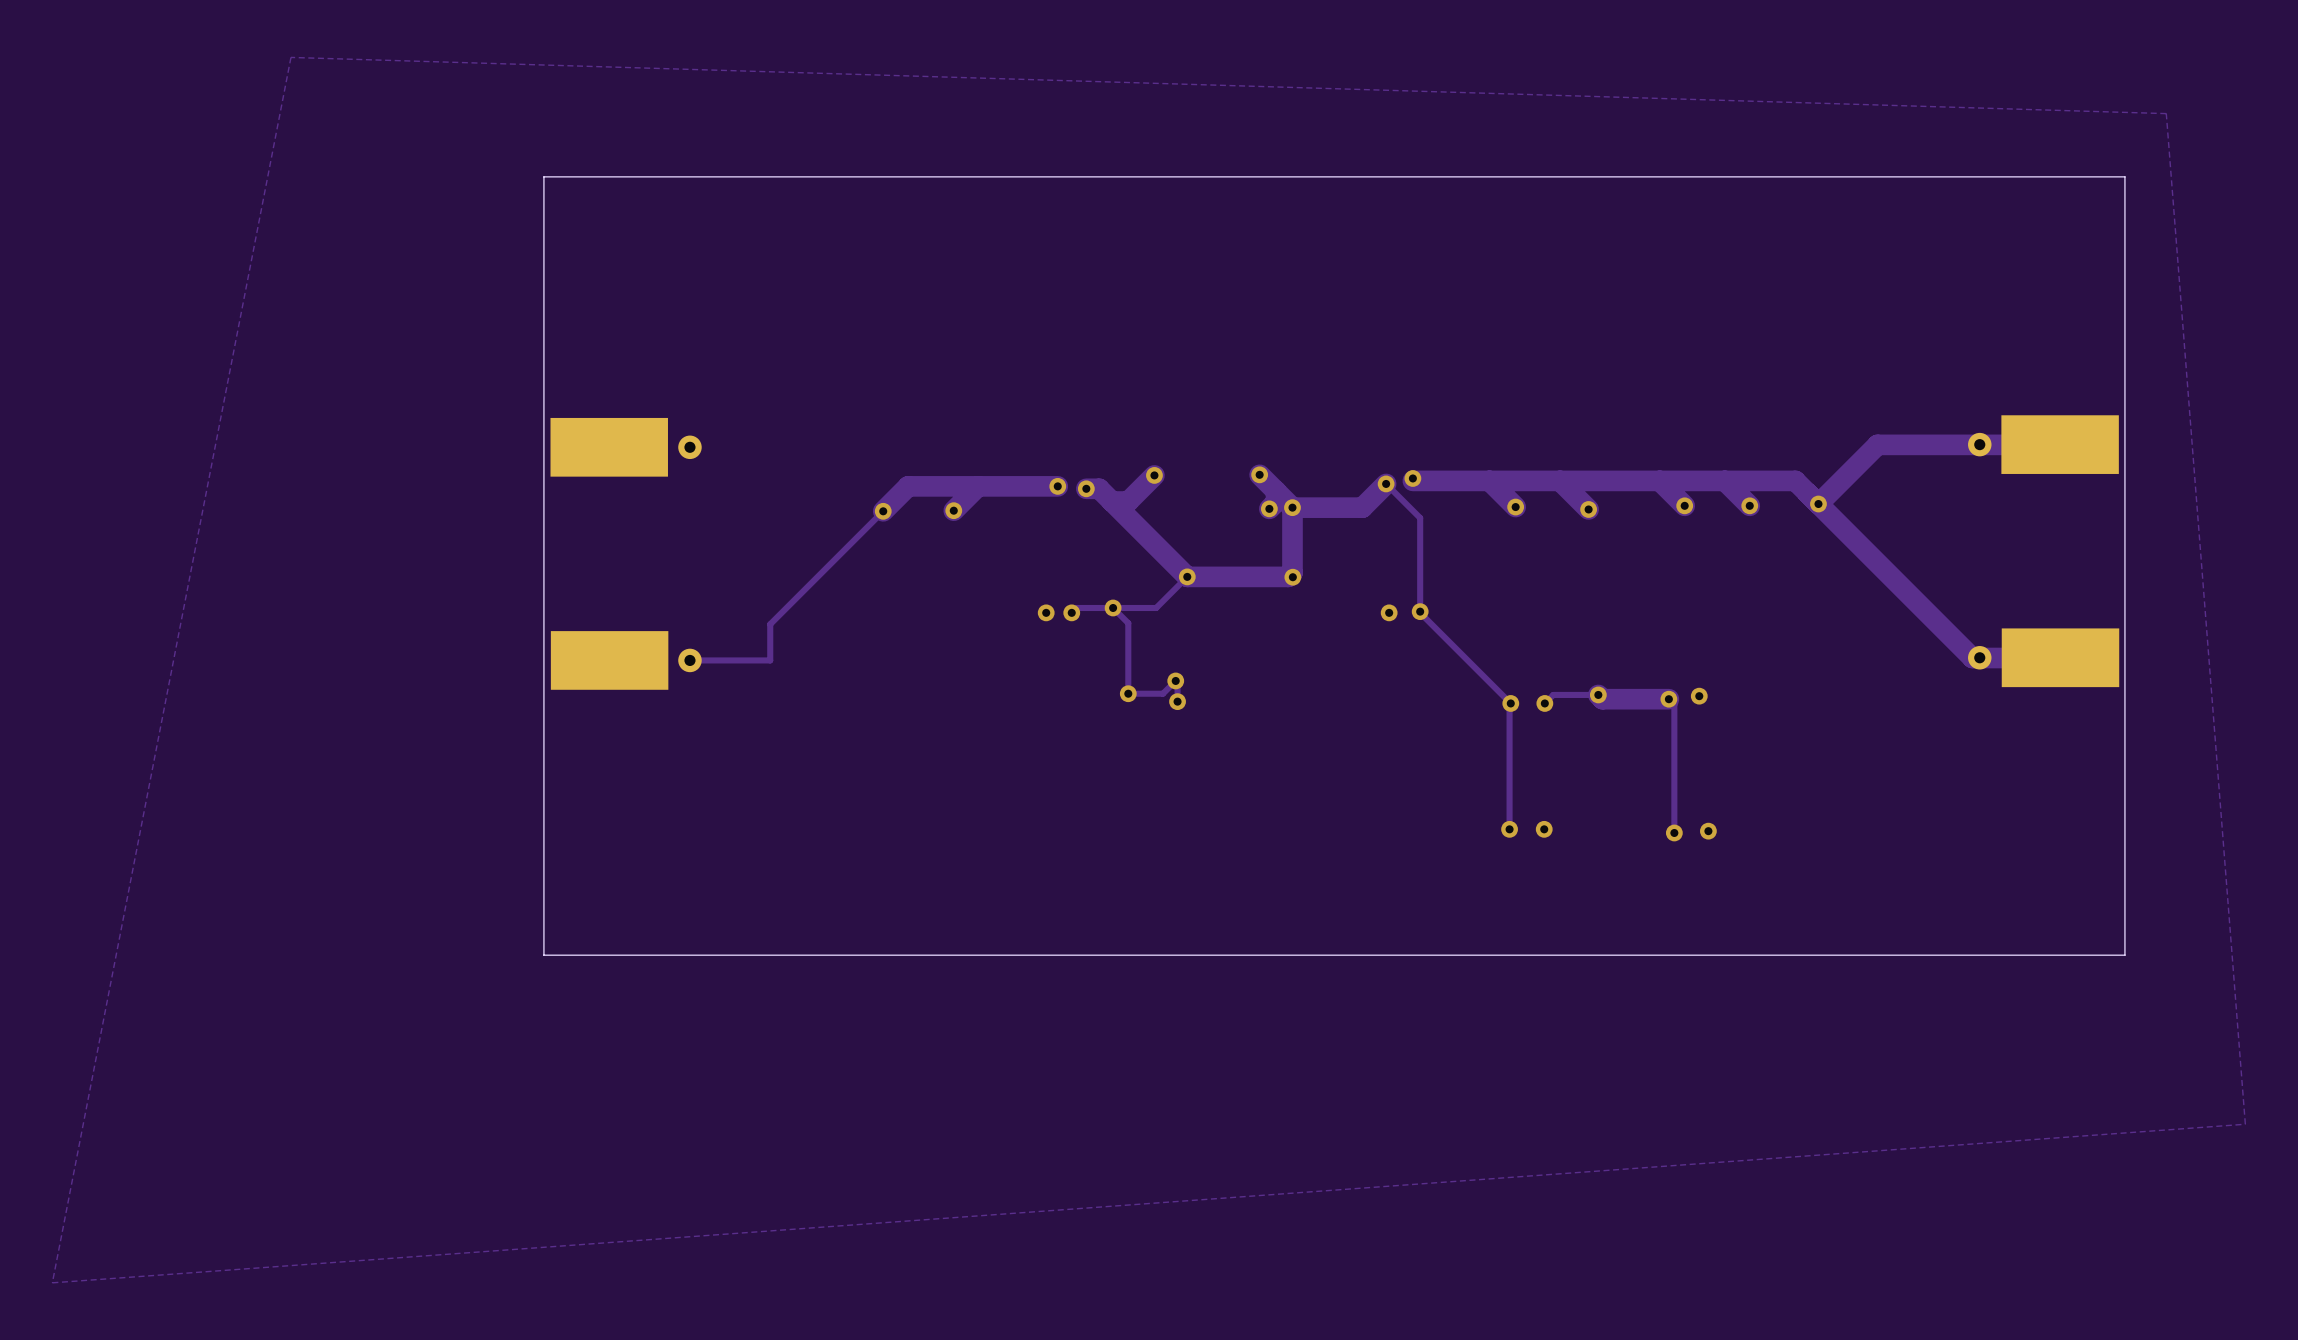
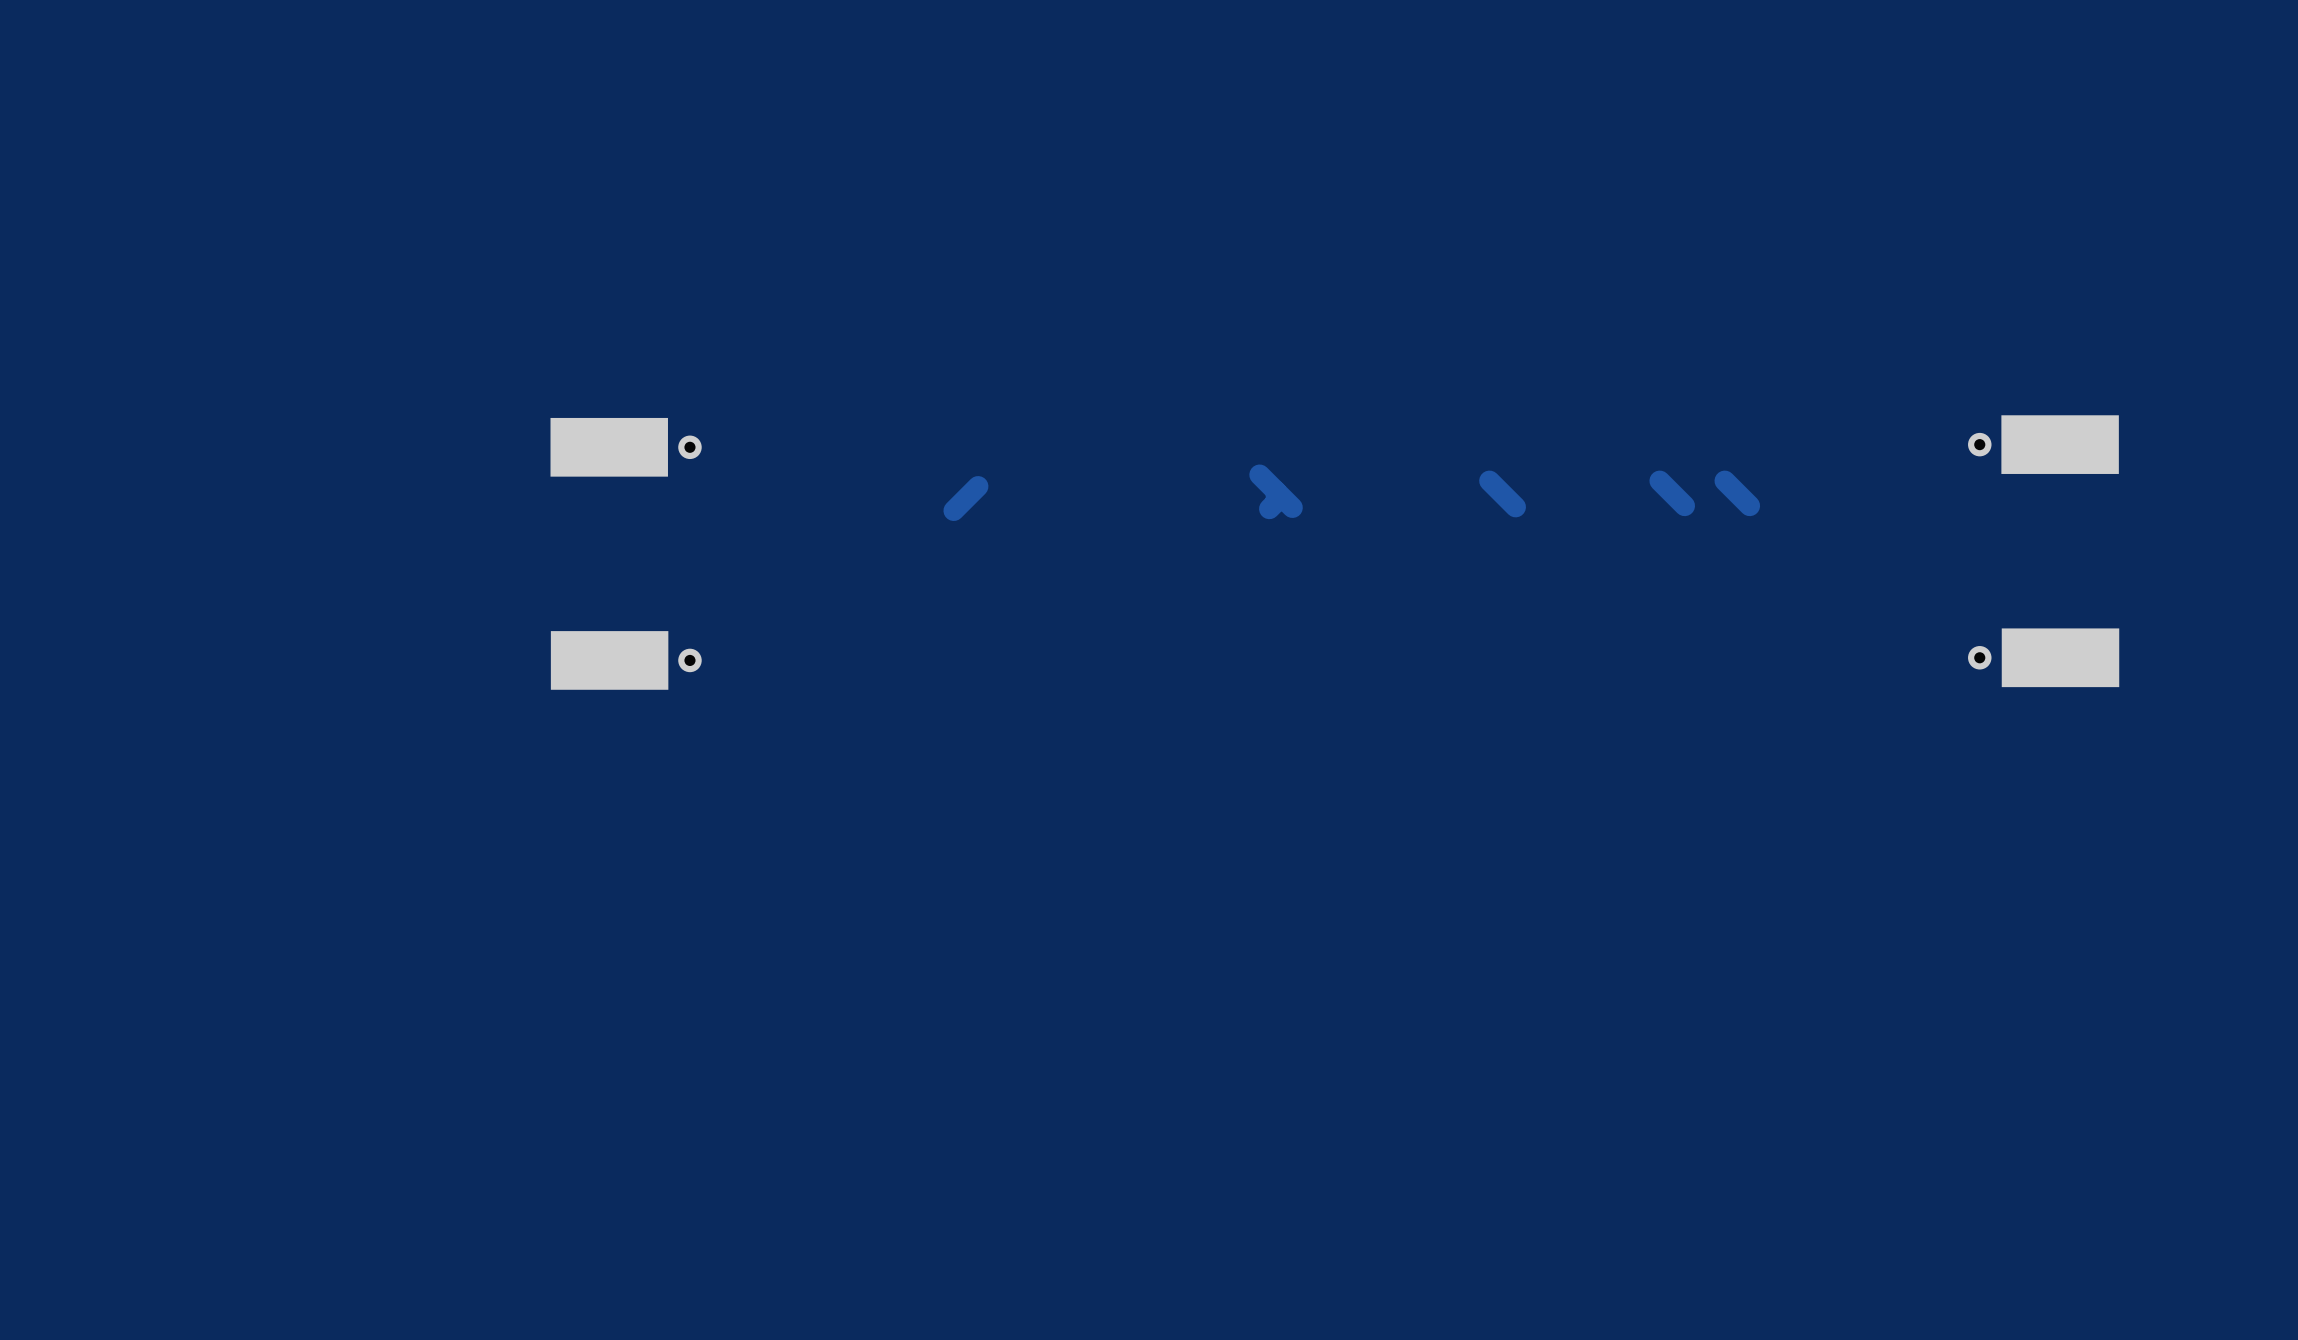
zone outline: (290, 57) (2166, 113) (2245, 1124) (52, 1282) (290, 57) -> none
board edge: (2124, 176) (543, 176) (543, 955) (2124, 955) (2124, 176) -> none
track: (2061, 444) (1877, 444) (1818, 504) -> none
via: (1259, 474) -> none
track: (1154, 475) (1128, 501) (1111, 501) -> none
via: (1154, 475) -> none
via: (1412, 478) -> none
track: (1412, 480) (1795, 480) (1972, 658) (2062, 658) -> none
track: (1560, 480) (1588, 509) -> none
via: (1386, 483) -> none
track: (1057, 486) (908, 486) (770, 624) (770, 660) (689, 660) -> none
via: (1057, 486) -> none
track: (1086, 488) (1099, 488) (1187, 576) -> none
via: (1086, 488) -> none
via: (1818, 504) -> none
via: (1684, 505) -> none
via: (1749, 505) -> none
via: (1292, 507) -> none
via: (1515, 507) -> none
via: (1269, 508) -> none
via: (1588, 509) -> none
via: (953, 510) -> none
via: (883, 511) -> none
track: (1187, 576) (1288, 576) (1292, 572) (1292, 507) (1362, 507) (1386, 483) (1420, 517) (1421, 611) -> none
track: (1187, 576) (1156, 607) (1076, 607) (1071, 612) -> none
via: (1187, 576) -> none
via: (1292, 577) -> none
track: (1113, 607) (1128, 623) (1128, 693) (1162, 693) (1175, 680) (1177, 682) (1177, 701) -> none
via: (1113, 607) -> none
via: (1420, 611) -> none
via: (1046, 612) -> none
via: (1071, 612) -> none
via: (1389, 612) -> none
track: (1421, 614) (1510, 703) (1509, 829) -> none
via: (1175, 680) -> none
via: (1128, 693) -> none
via: (1598, 694) -> none
via: (1699, 696) -> none
via: (1668, 699) -> none
via: (1177, 701) -> none
via: (1510, 703) -> none
track: (1544, 703) (1553, 694) (1598, 694) (1602, 699) (1668, 699) (1674, 704) (1674, 832) -> none
via: (1544, 703) -> none
via: (1509, 829) -> none
via: (1544, 829) -> none
via: (1708, 831) -> none
via: (1674, 832) -> none

